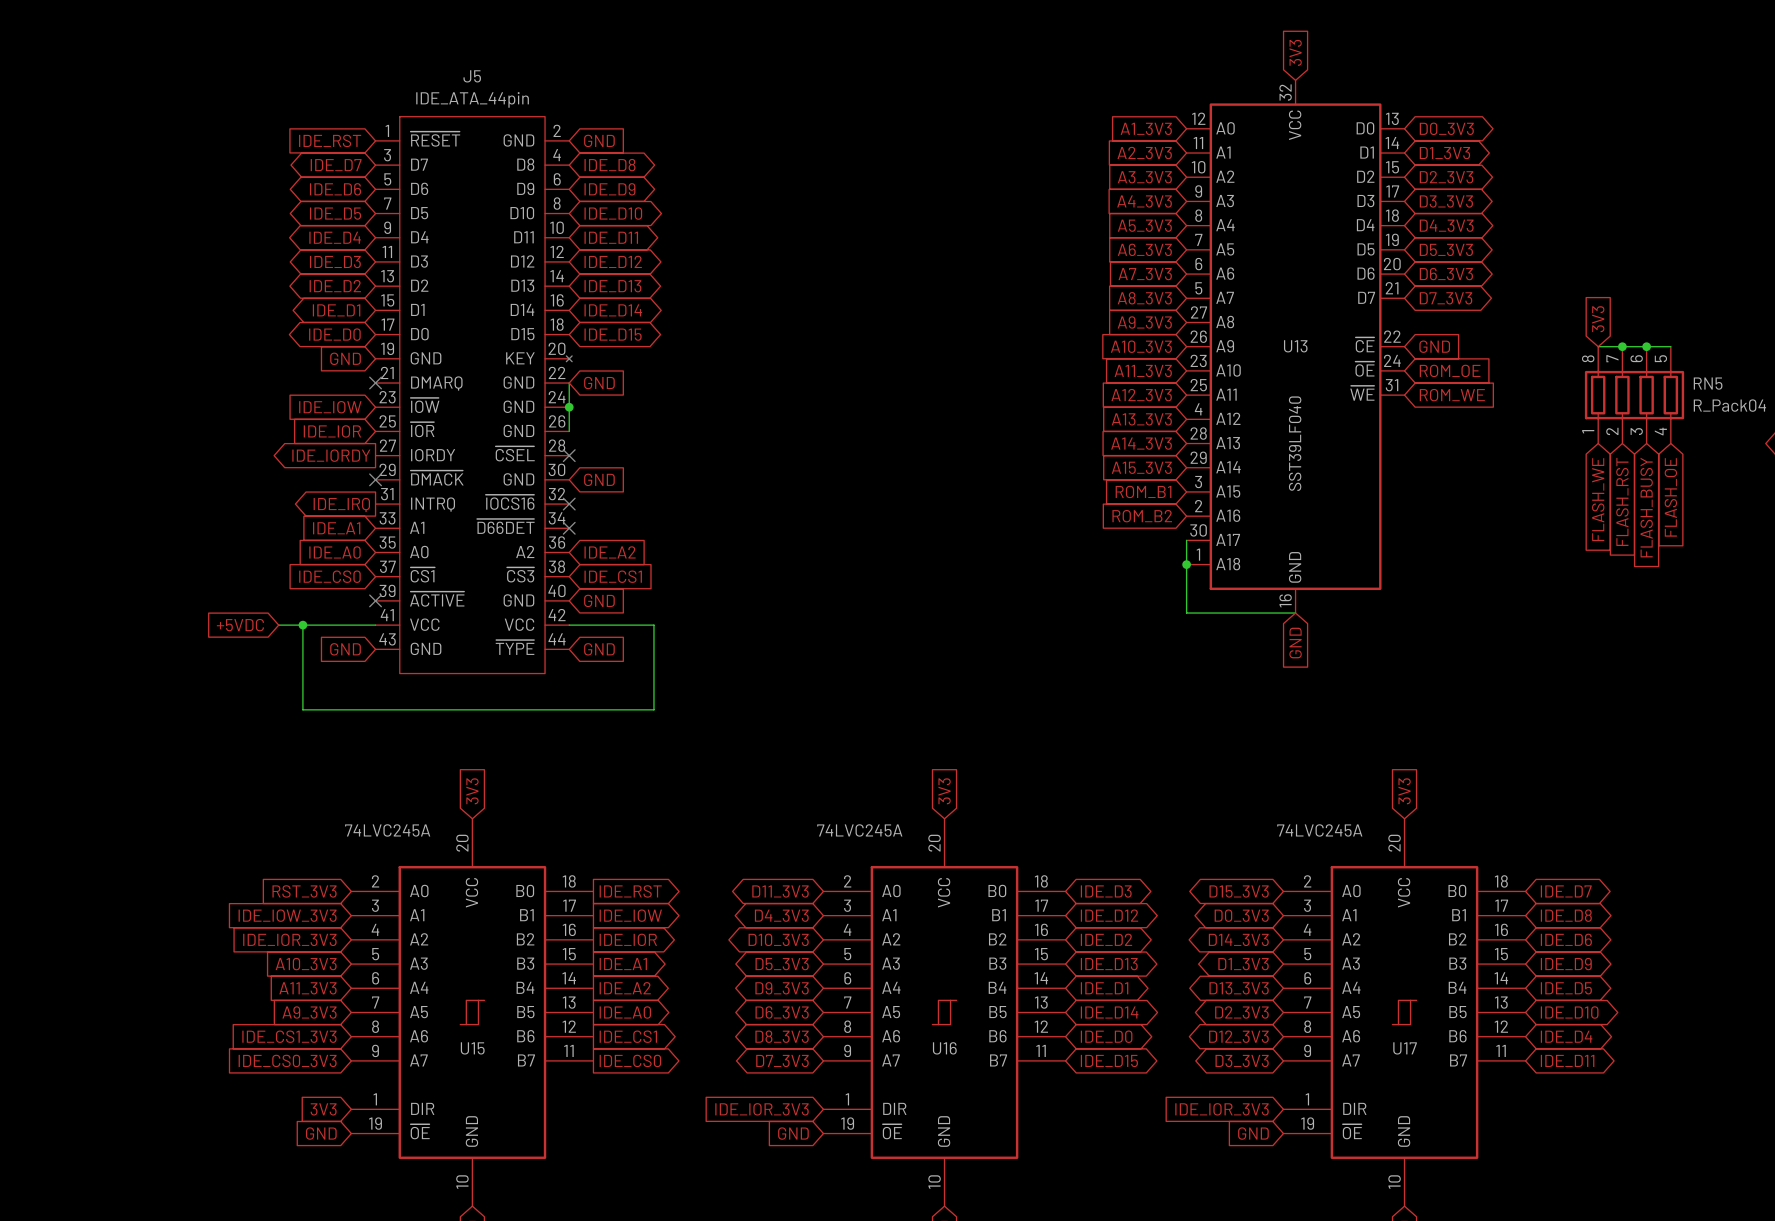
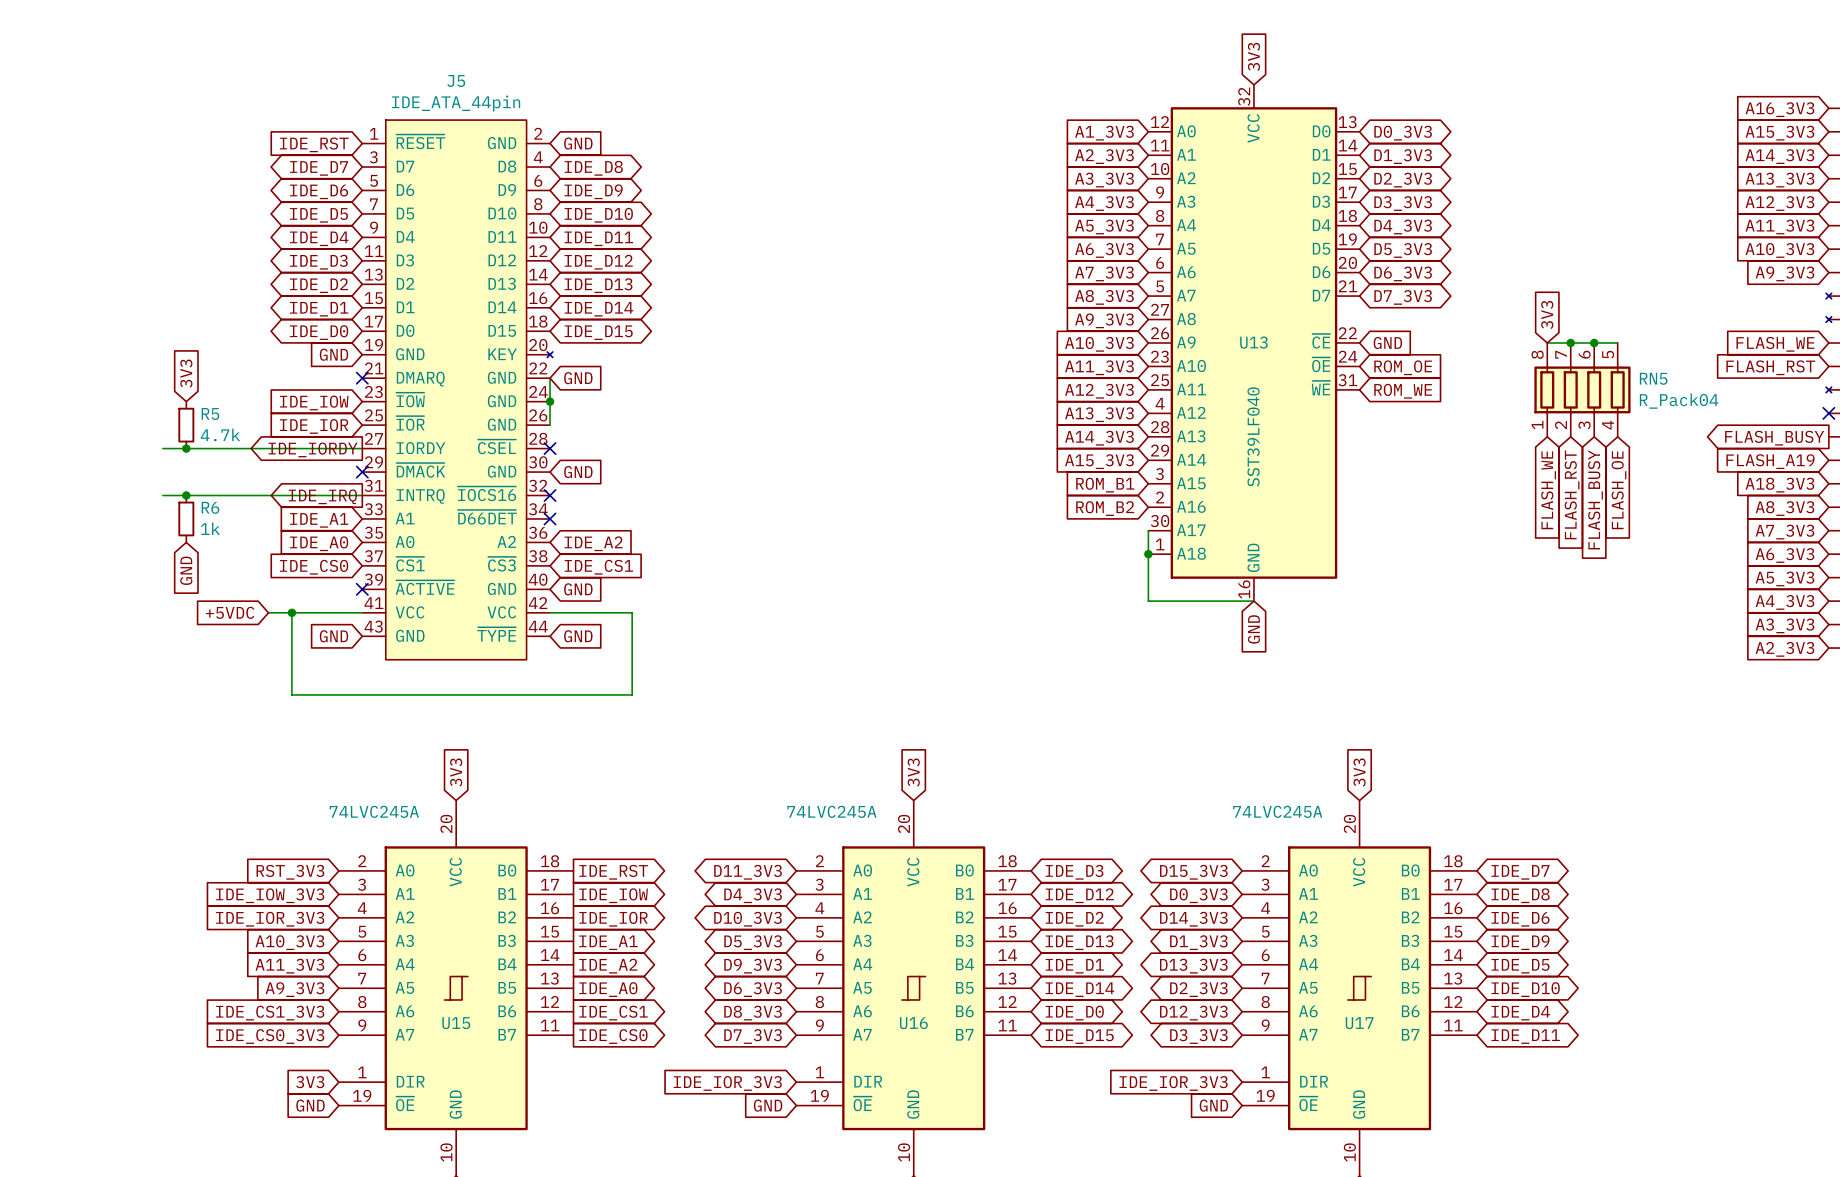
global label: none -> 3V3 (186, 373)
R5: none -> 4.7k (186, 425)
wire: none -> (162, 448) (362, 448)
junction: none -> (186, 448)
wire: none -> (162, 495) (362, 495)
junction: none -> (186, 495)
R6: none -> 1k (186, 518)
global label: none -> GND (186, 570)

